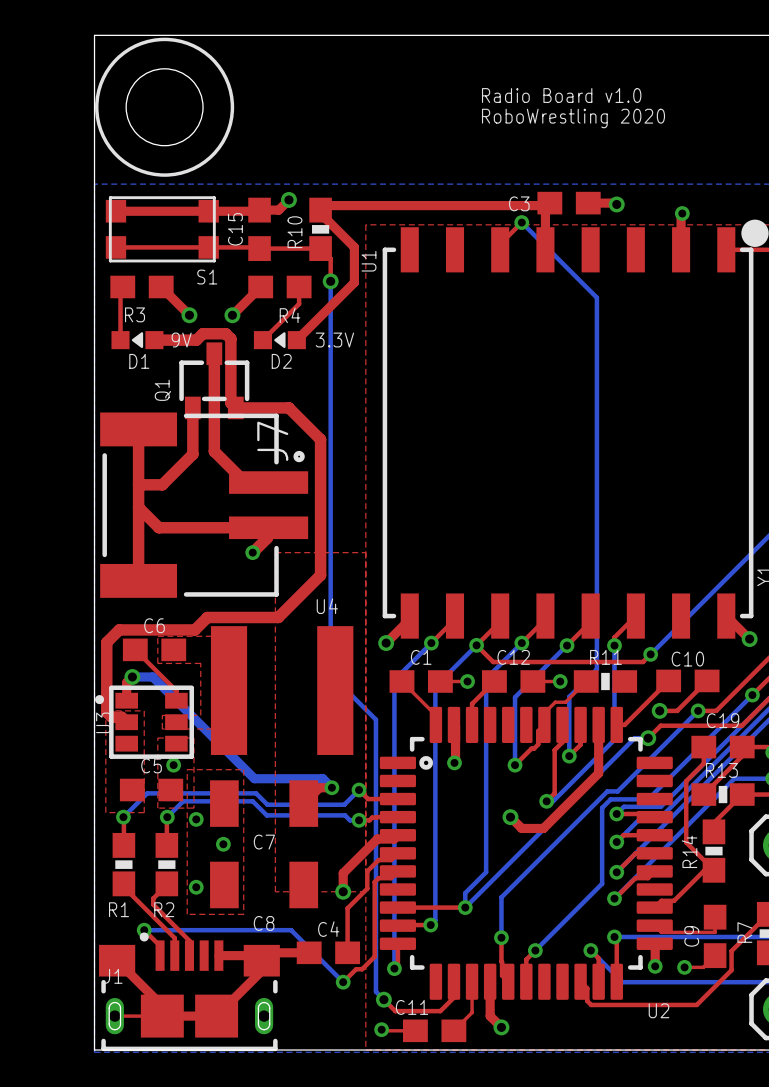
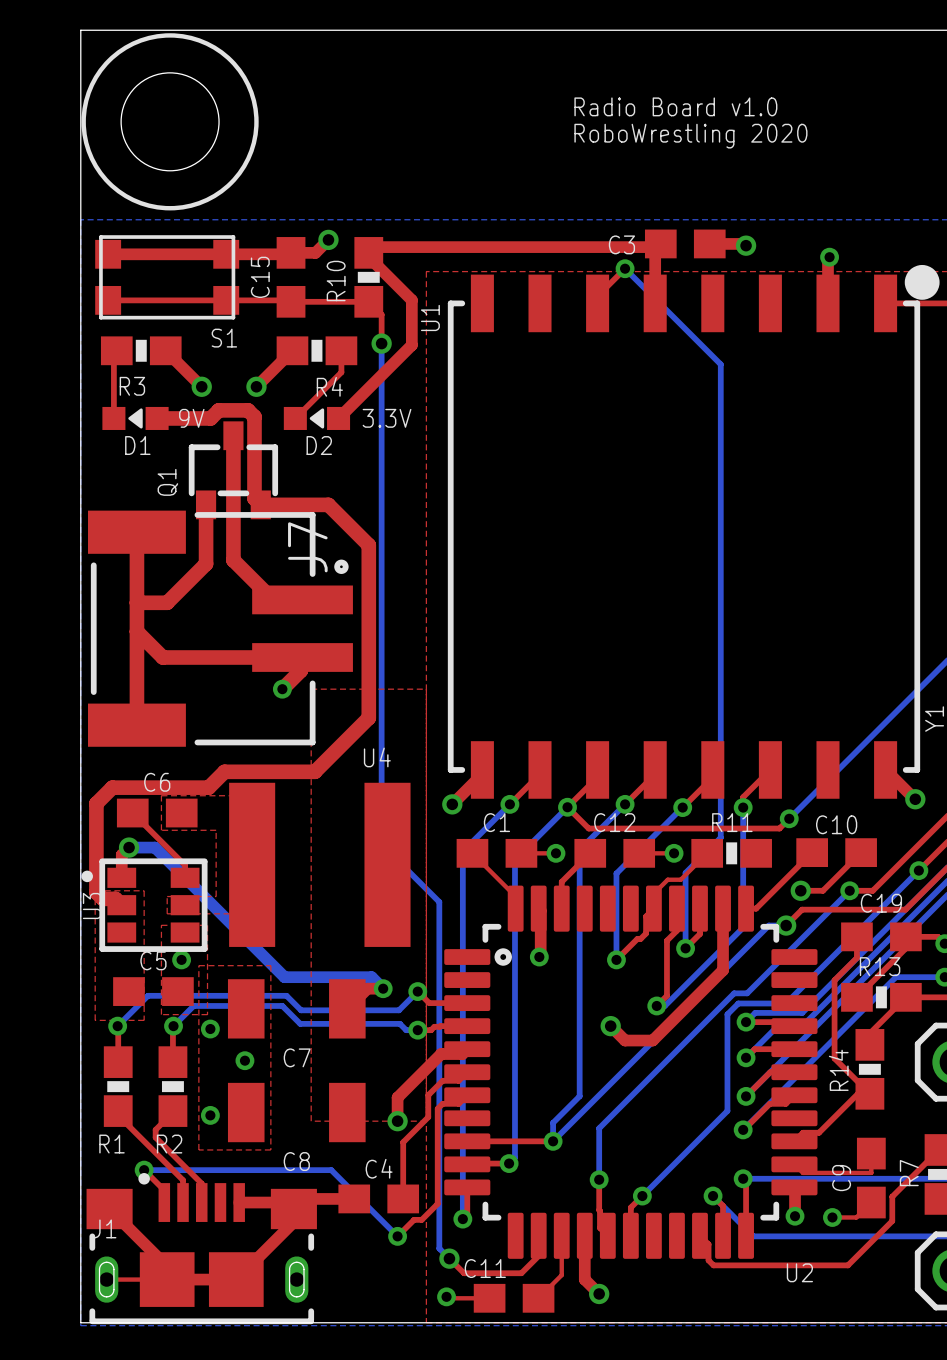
R3 footprint: [110, 275, 174, 299] -> [100, 336, 182, 366]
R4 footprint: [248, 275, 312, 299] -> [276, 336, 358, 366]

